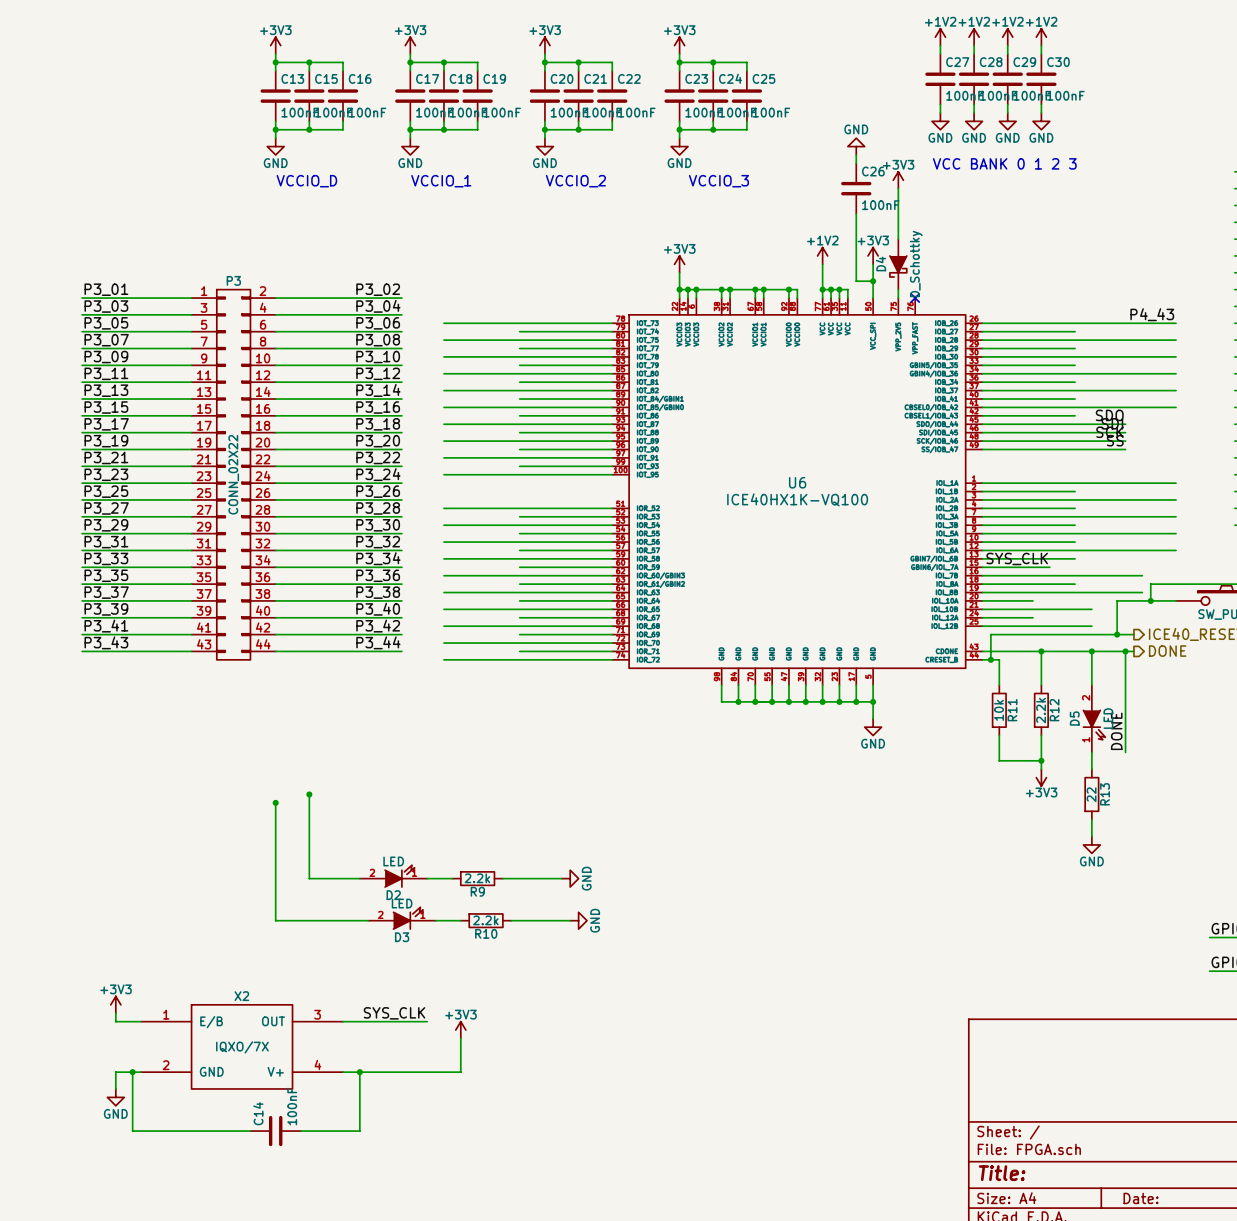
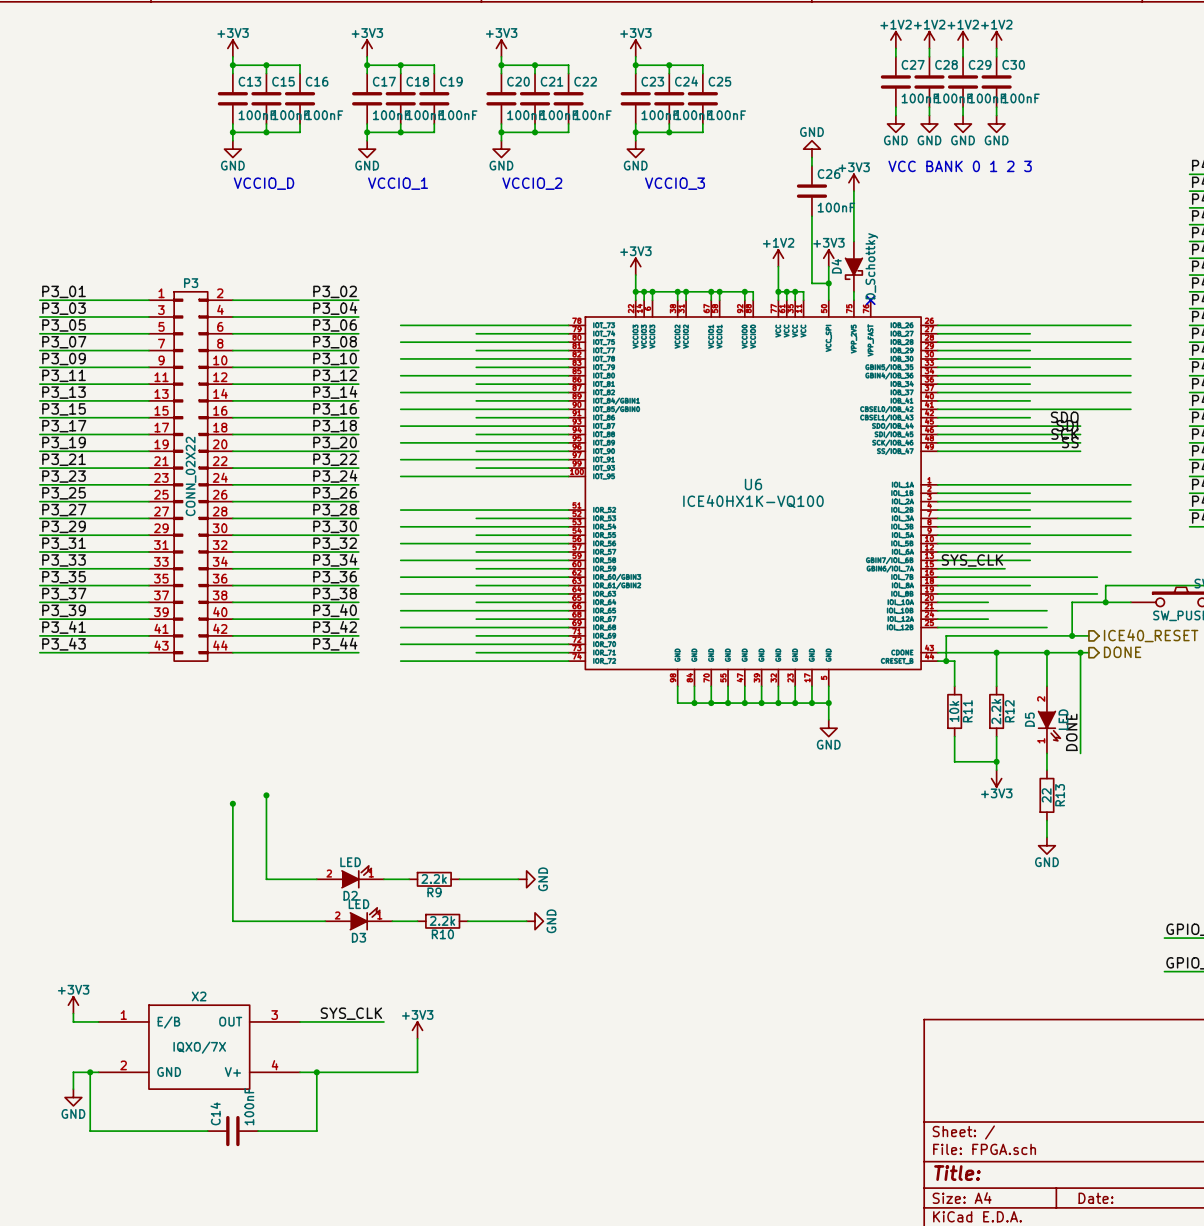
label: P4_43 (1152, 314) -> none

